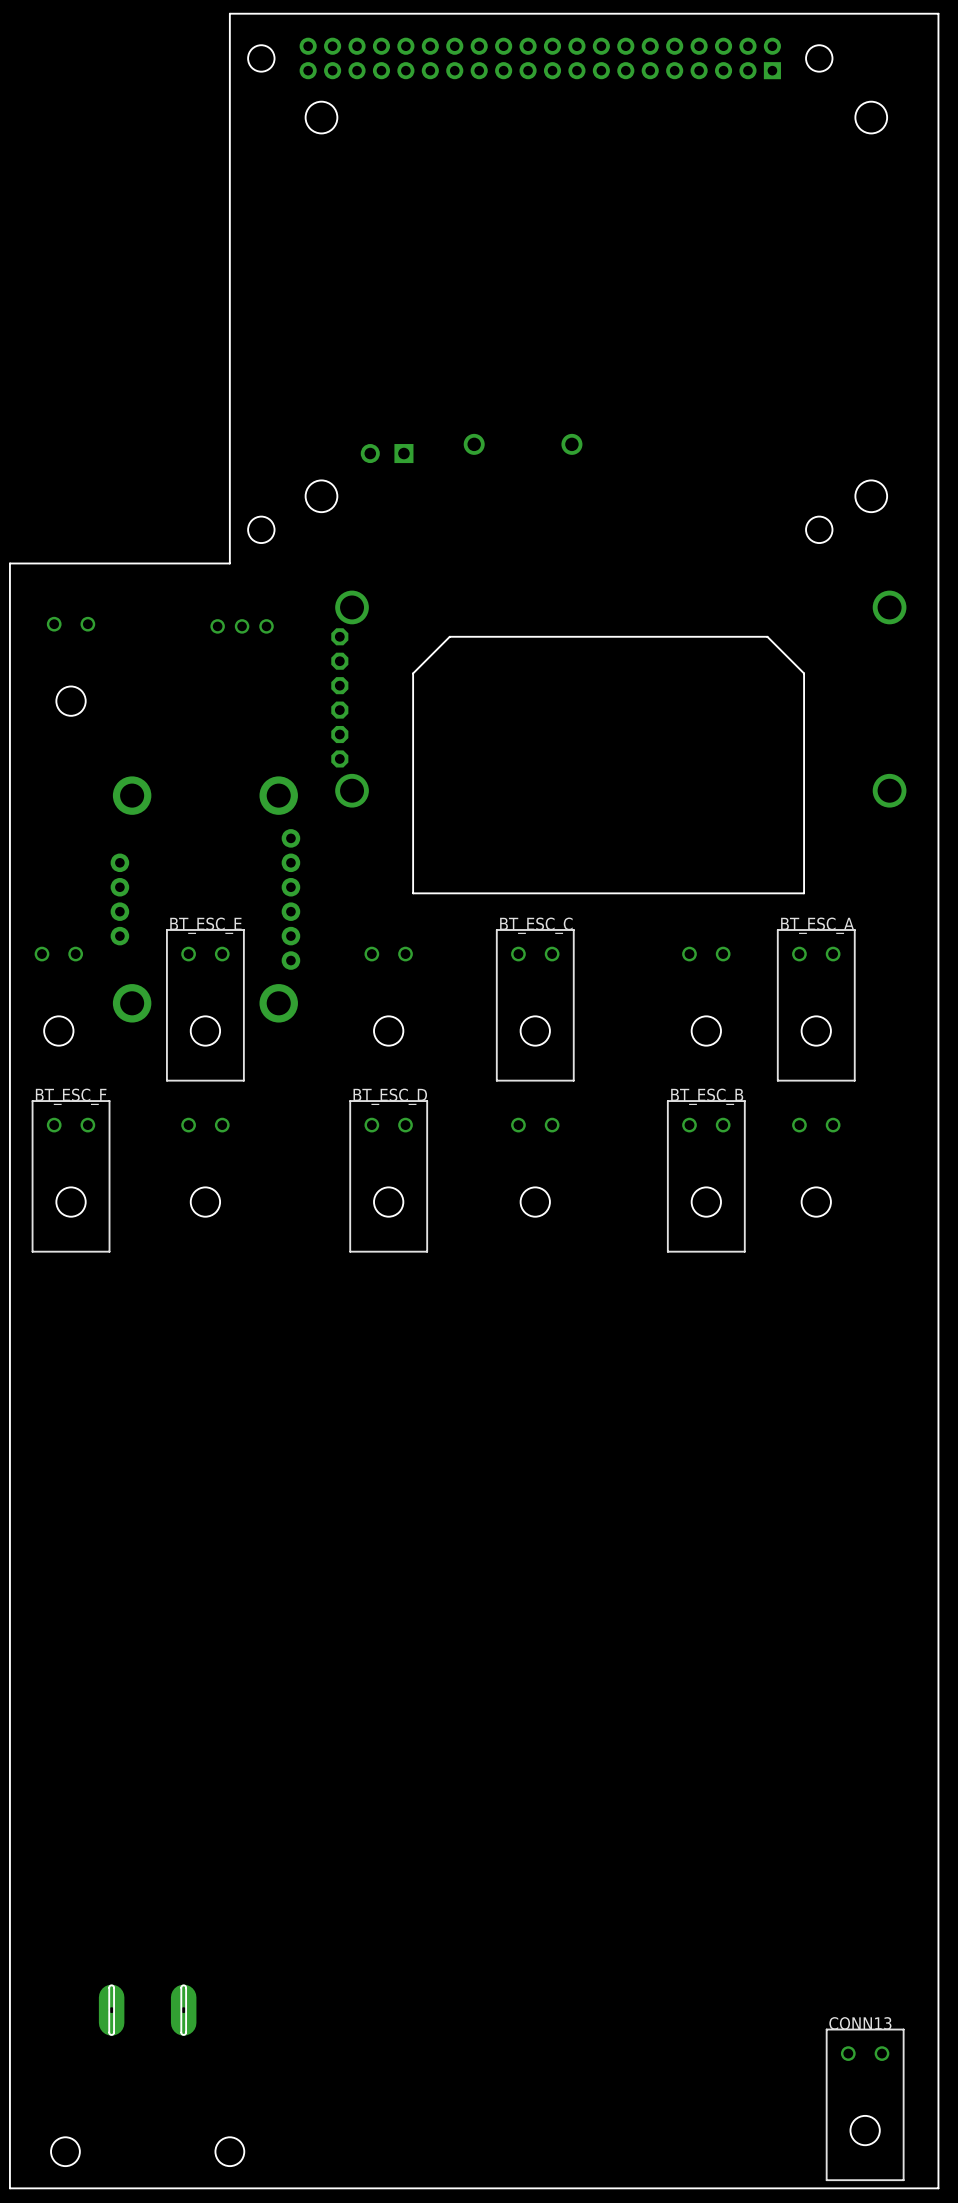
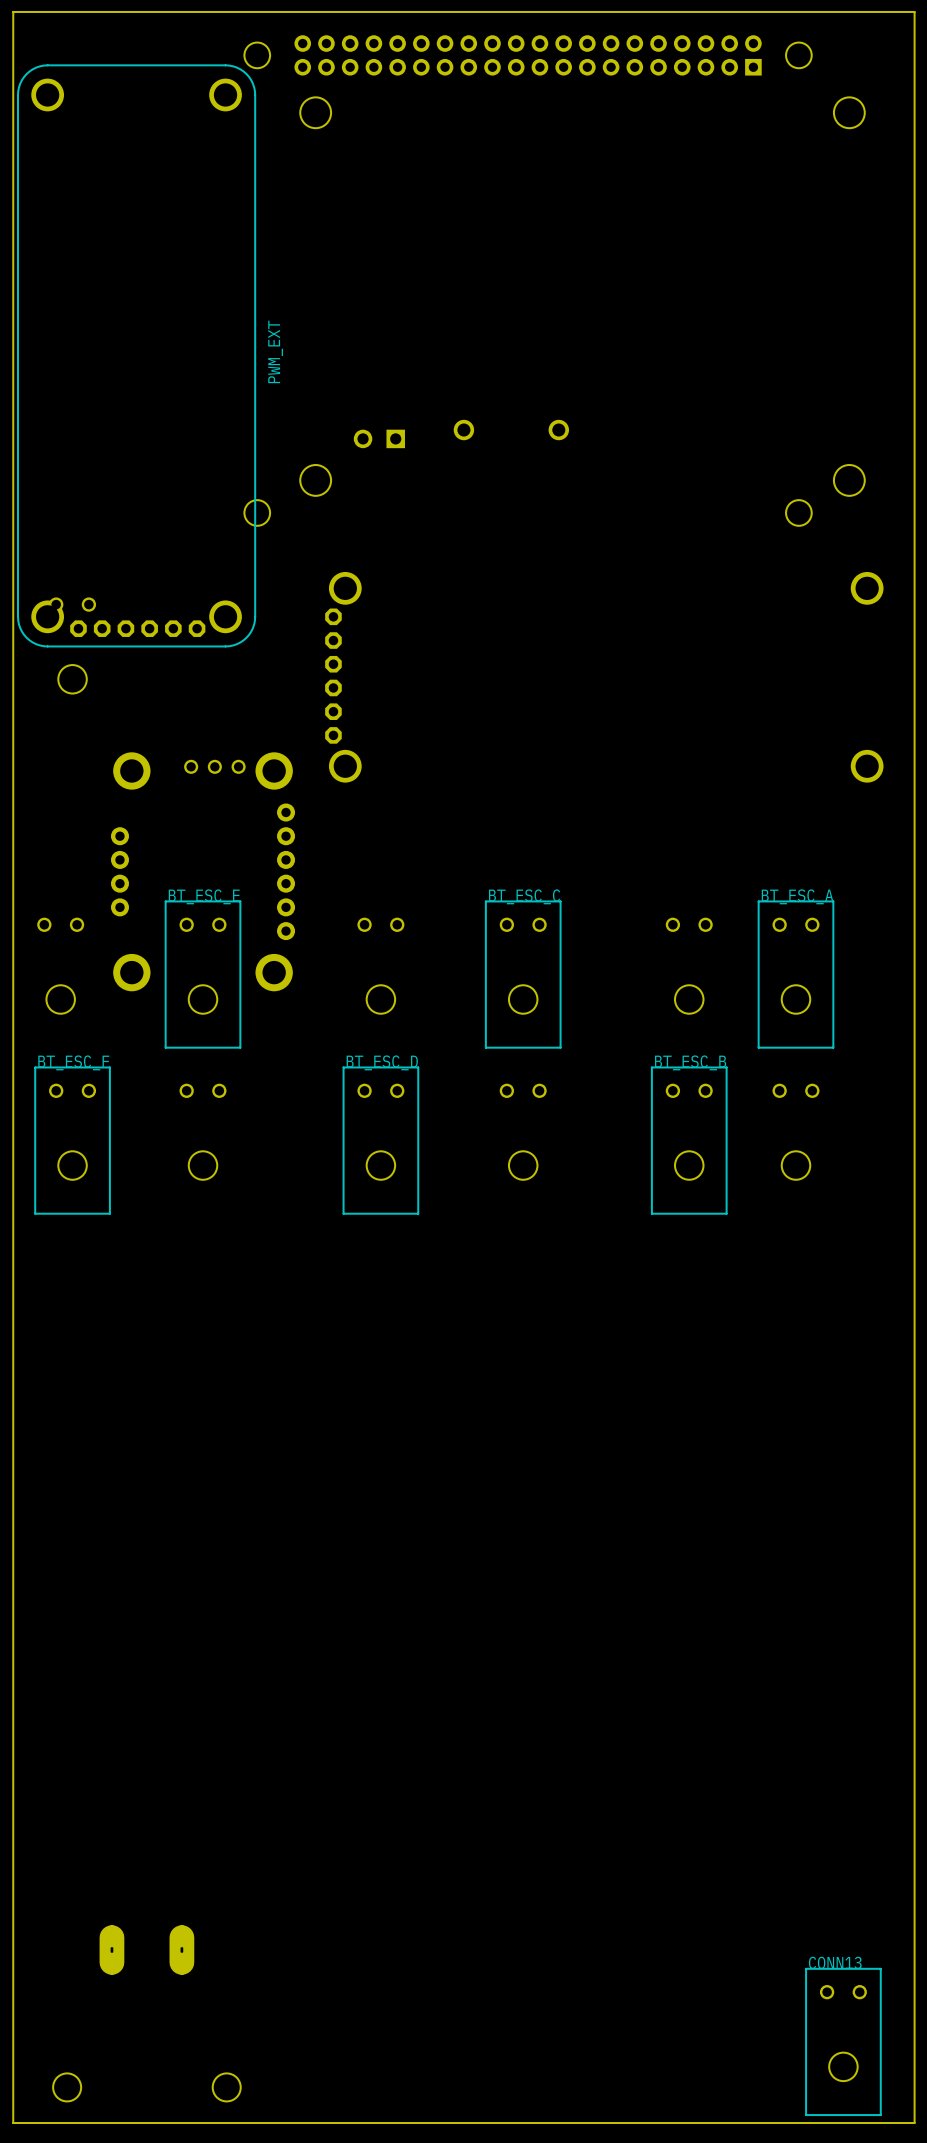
board edge: (229, 13) (229, 563) (9, 563) -> (226, 11) (13, 11) (13, 545)
PWM_EXT: none -> (136, 355)
part position: (242, 626) -> (214, 766)
board edge: (767, 636) (804, 673) (804, 893) (413, 893) (413, 673) (449, 636) (767, 636) -> none

